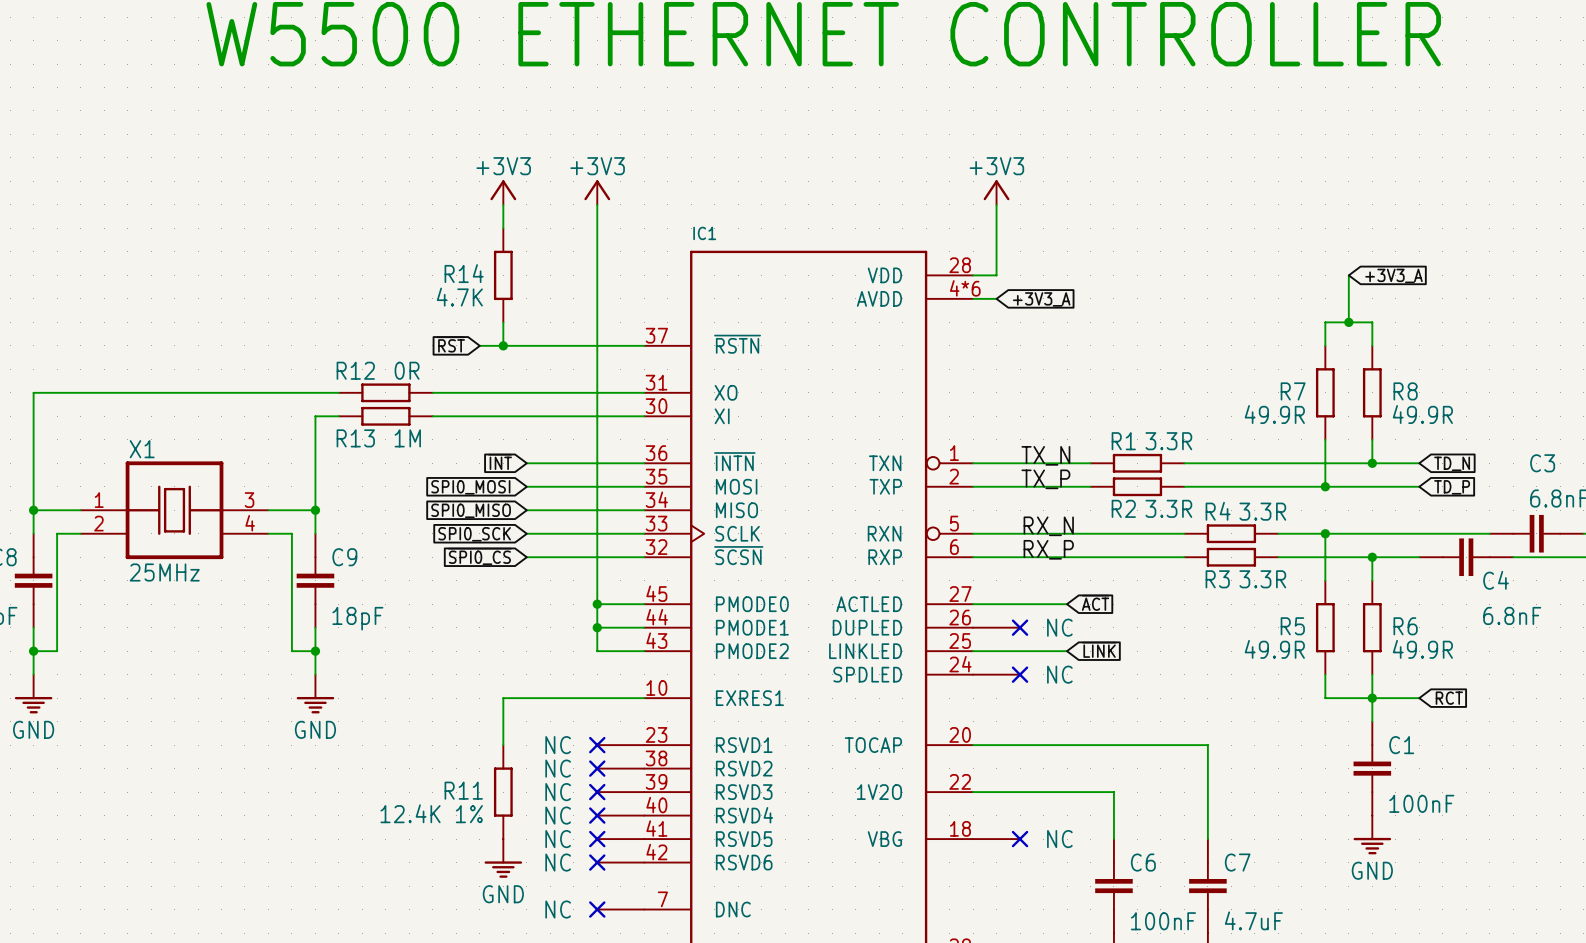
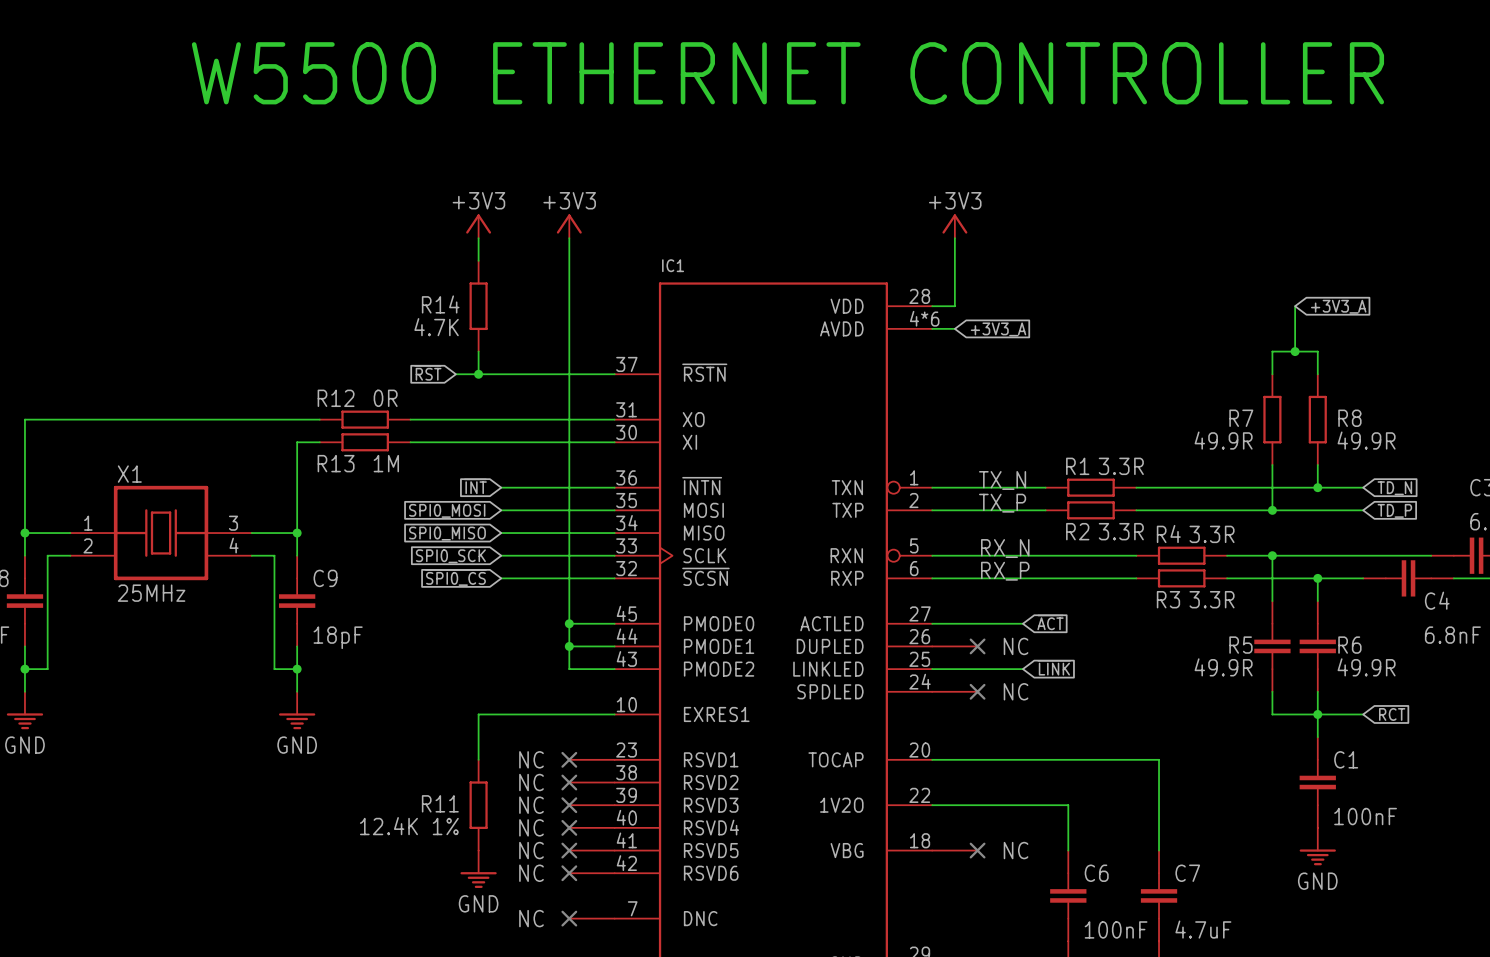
R5 symbol: [1315, 580, 1335, 675] -> [1254, 601, 1291, 692]
R6 symbol: [1362, 580, 1382, 675] -> [1299, 601, 1336, 692]

